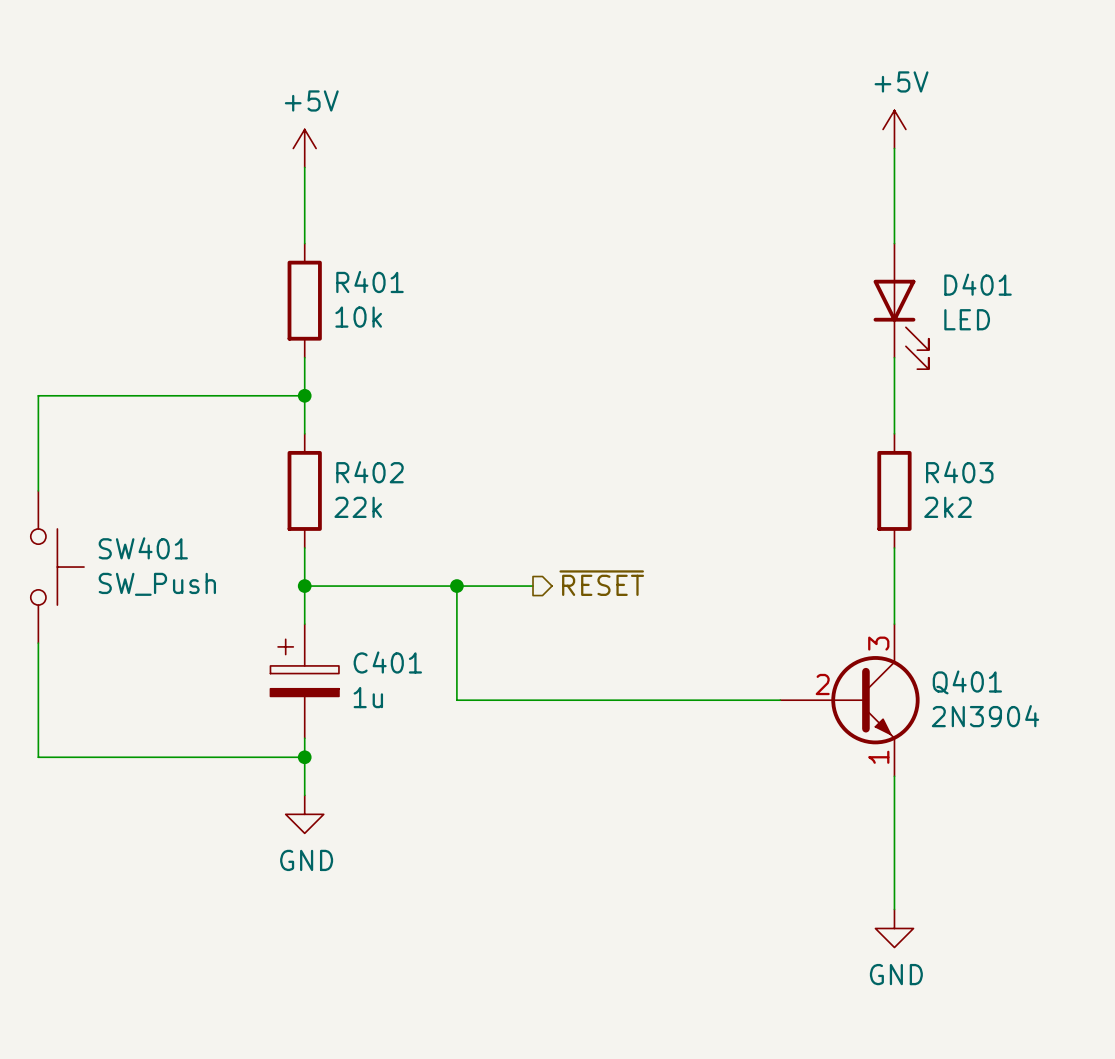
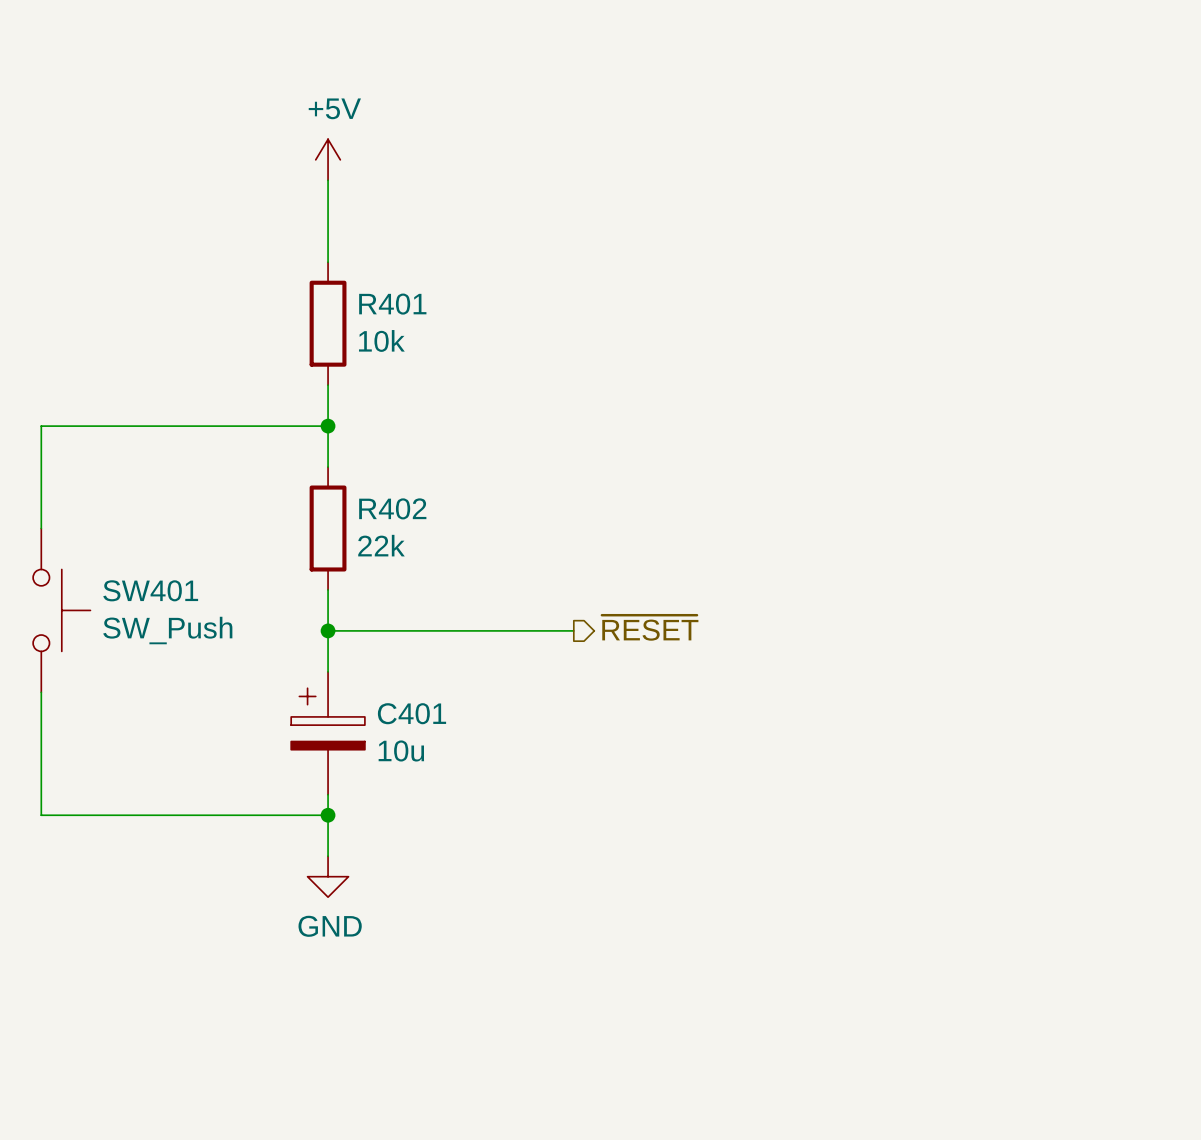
power symbol: +5V (894, 129) -> none
wire: (894, 148) (894, 243) -> none
D401: LED (901, 306) -> none
wire: (894, 357) (894, 433) -> none
R403: 2k2 (894, 490) -> none
wire: (894, 547) (894, 624) -> none
wire: (456, 586) (456, 700) (780, 700) -> none
junction: (456, 586) -> none
C401 value: 1u (368, 697) -> 10u (401, 750)
Q401: 2N3904 (849, 700) -> none
wire: (894, 776) (894, 909) -> none
power symbol: GND (894, 928) -> none

